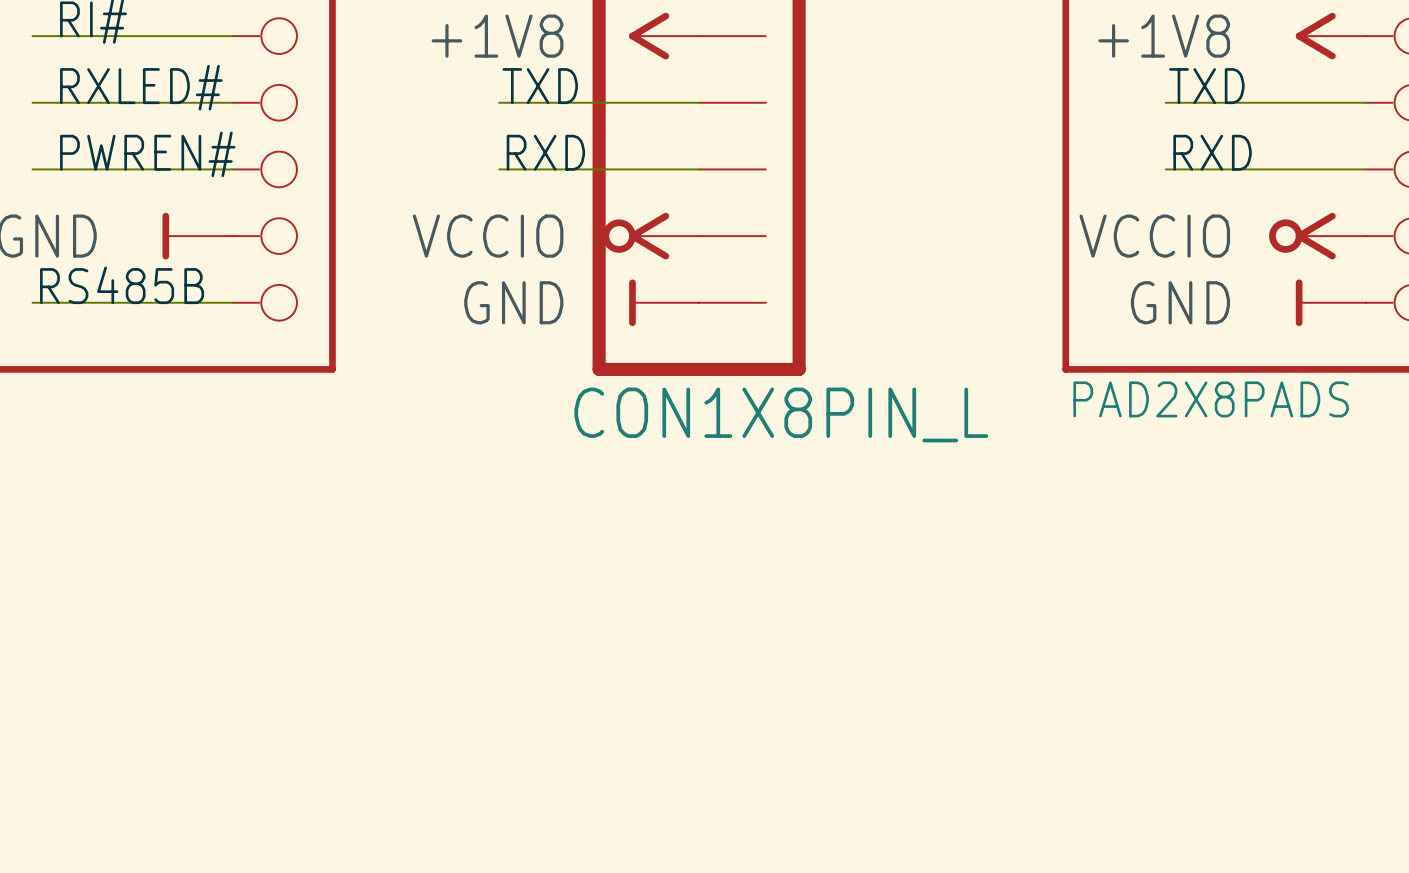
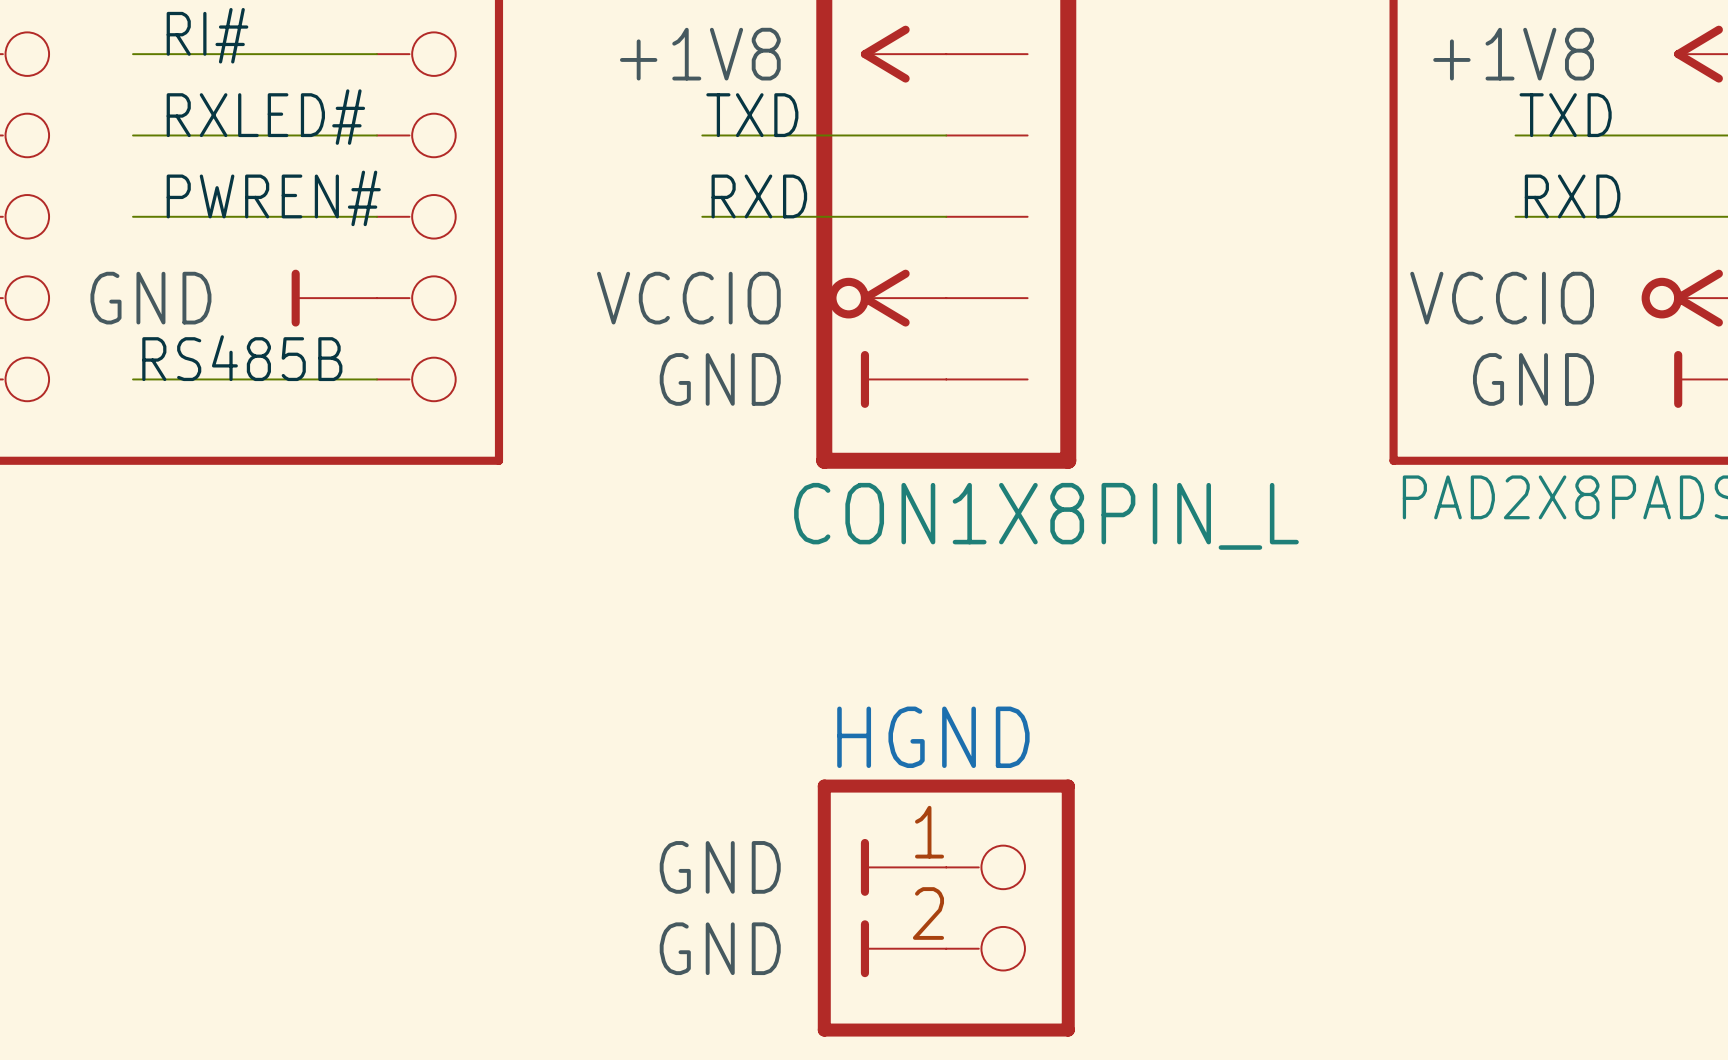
power symbol: none -> (903, 867)
HGND: none -> (946, 908)
power symbol: none -> (903, 948)

